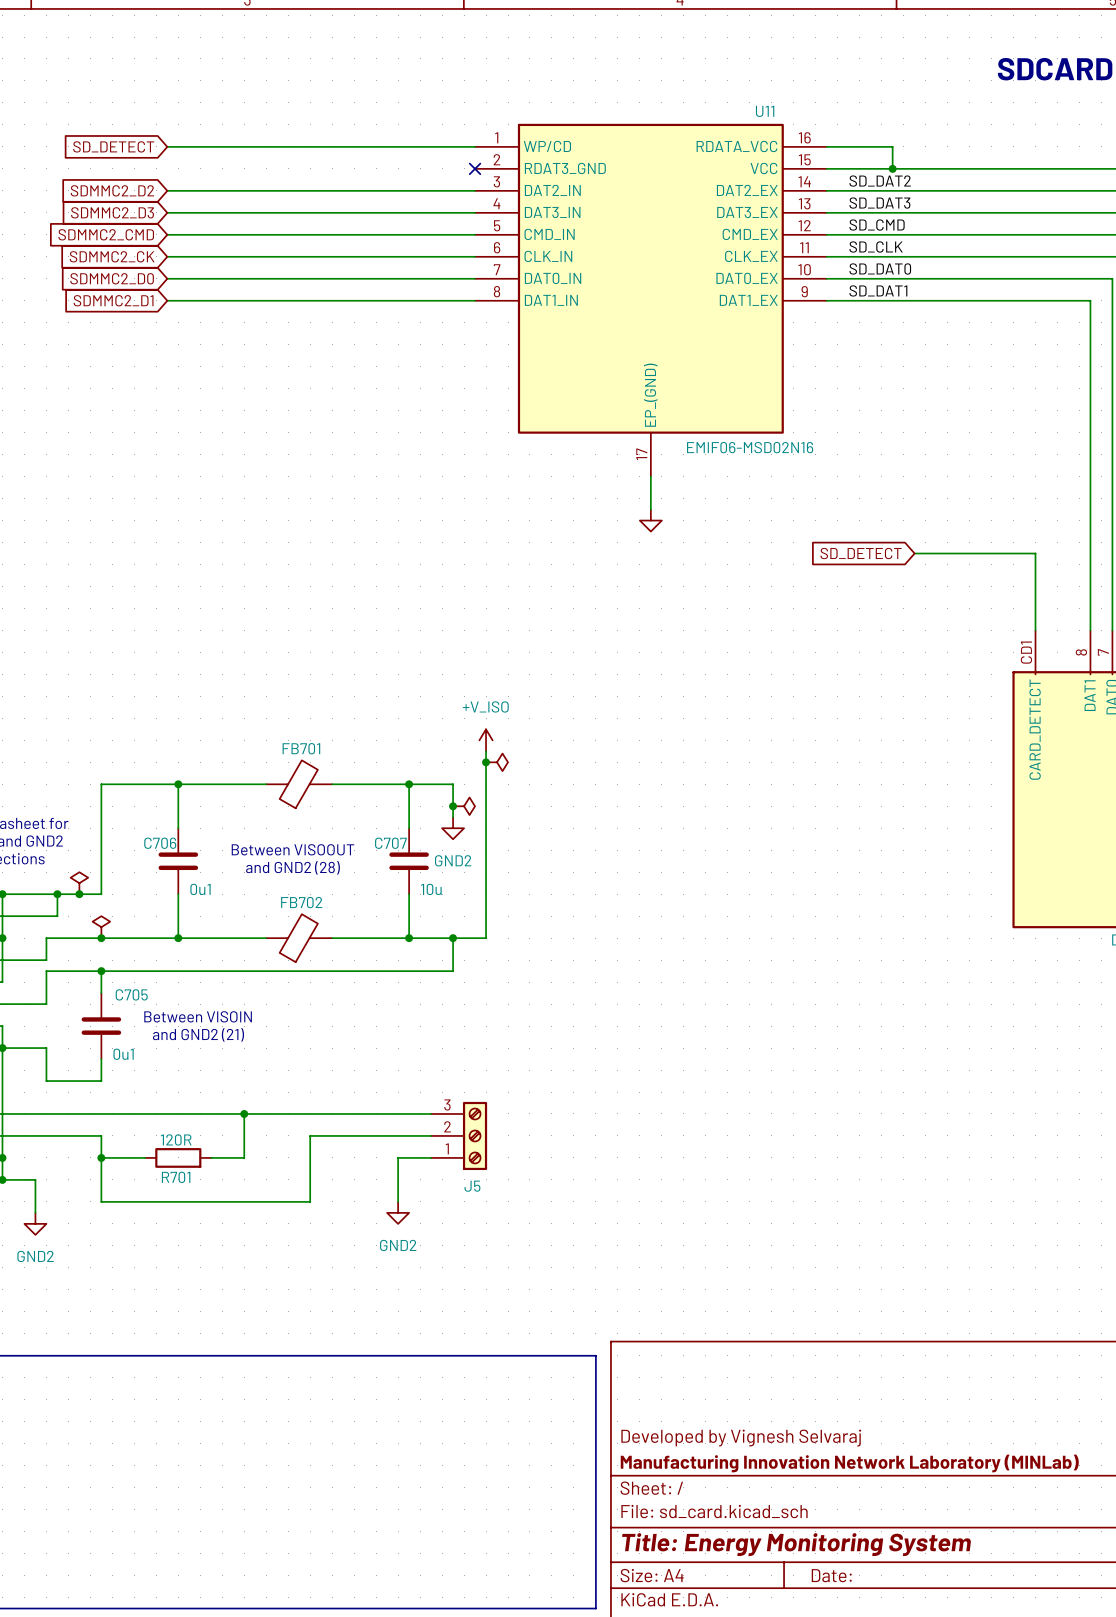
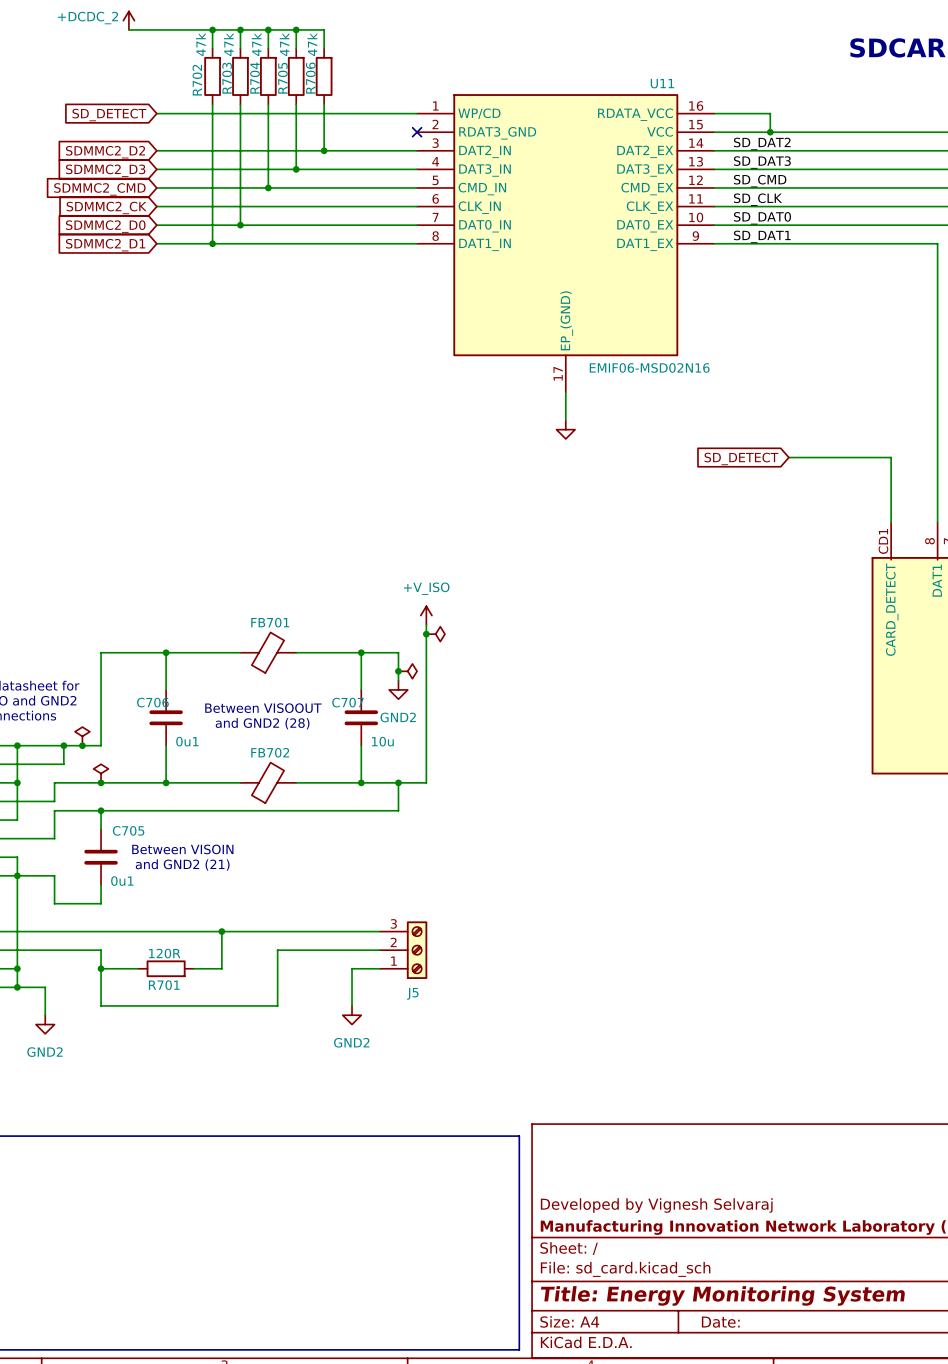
power symbol: none -> +DCDC_2 (128, 20)
wire: none -> (128, 29) (324, 29) (324, 48)
wire: none -> (212, 29) (212, 48)
junction: none -> (212, 29)
wire: none -> (240, 29) (240, 48)
junction: none -> (240, 29)
wire: none -> (268, 29) (268, 48)
junction: none -> (268, 29)
wire: none -> (296, 29) (296, 48)
junction: none -> (296, 29)
R702: none -> 47k (212, 76)
R703: none -> 47k (240, 76)
R704: none -> 47k (268, 76)
R705: none -> 47k (296, 76)
R706: none -> 47k (324, 76)
wire: none -> (212, 104) (212, 243)
wire: none -> (240, 104) (240, 225)
wire: none -> (268, 104) (268, 187)
wire: none -> (296, 104) (296, 169)
wire: none -> (324, 104) (324, 150)
junction: none -> (324, 150)
junction: none -> (296, 169)
junction: none -> (268, 187)
junction: none -> (240, 225)
junction: none -> (212, 243)

